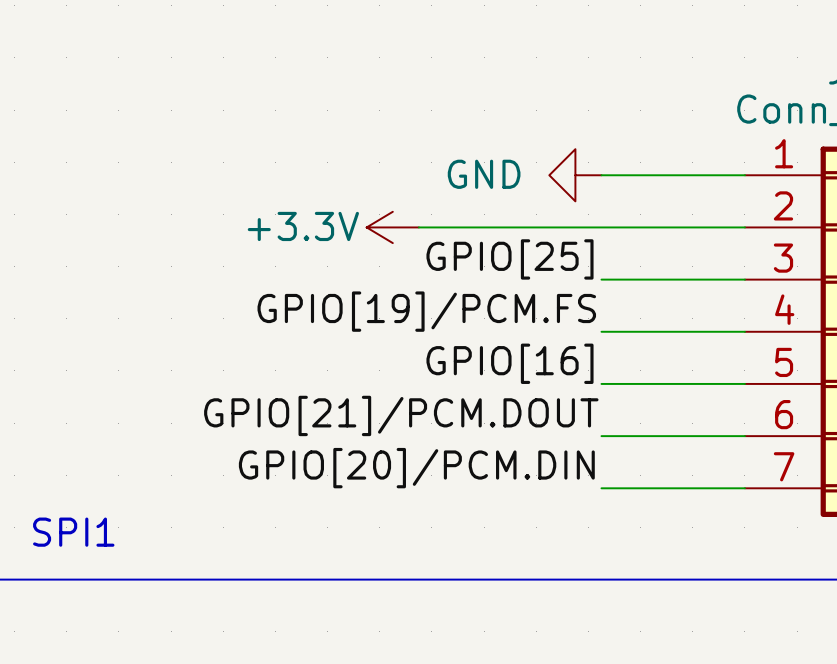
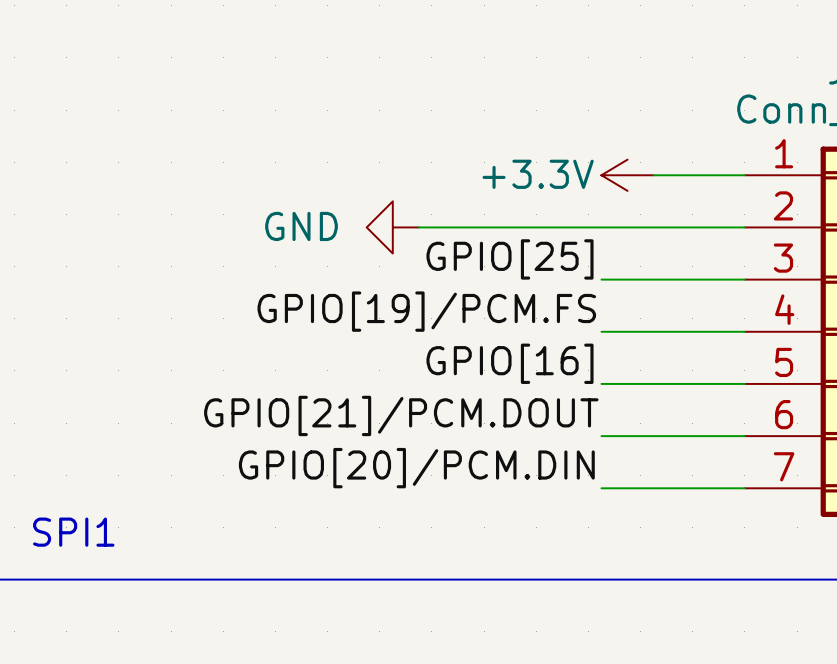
power symbol: GND (575, 175) -> none
power symbol: none -> +3.3V (627, 175)
power symbol: +3.3V (392, 227) -> GND (392, 227)

